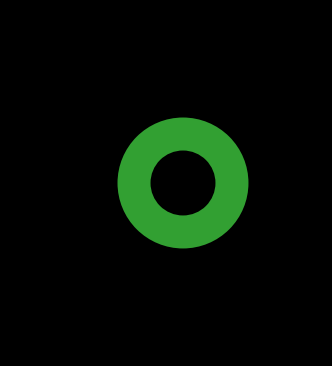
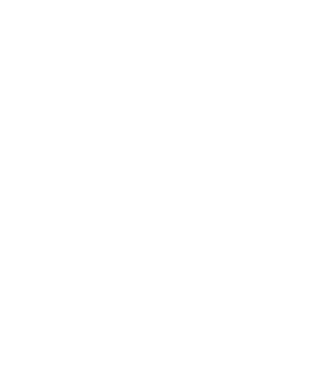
part: (182, 182) -> none

